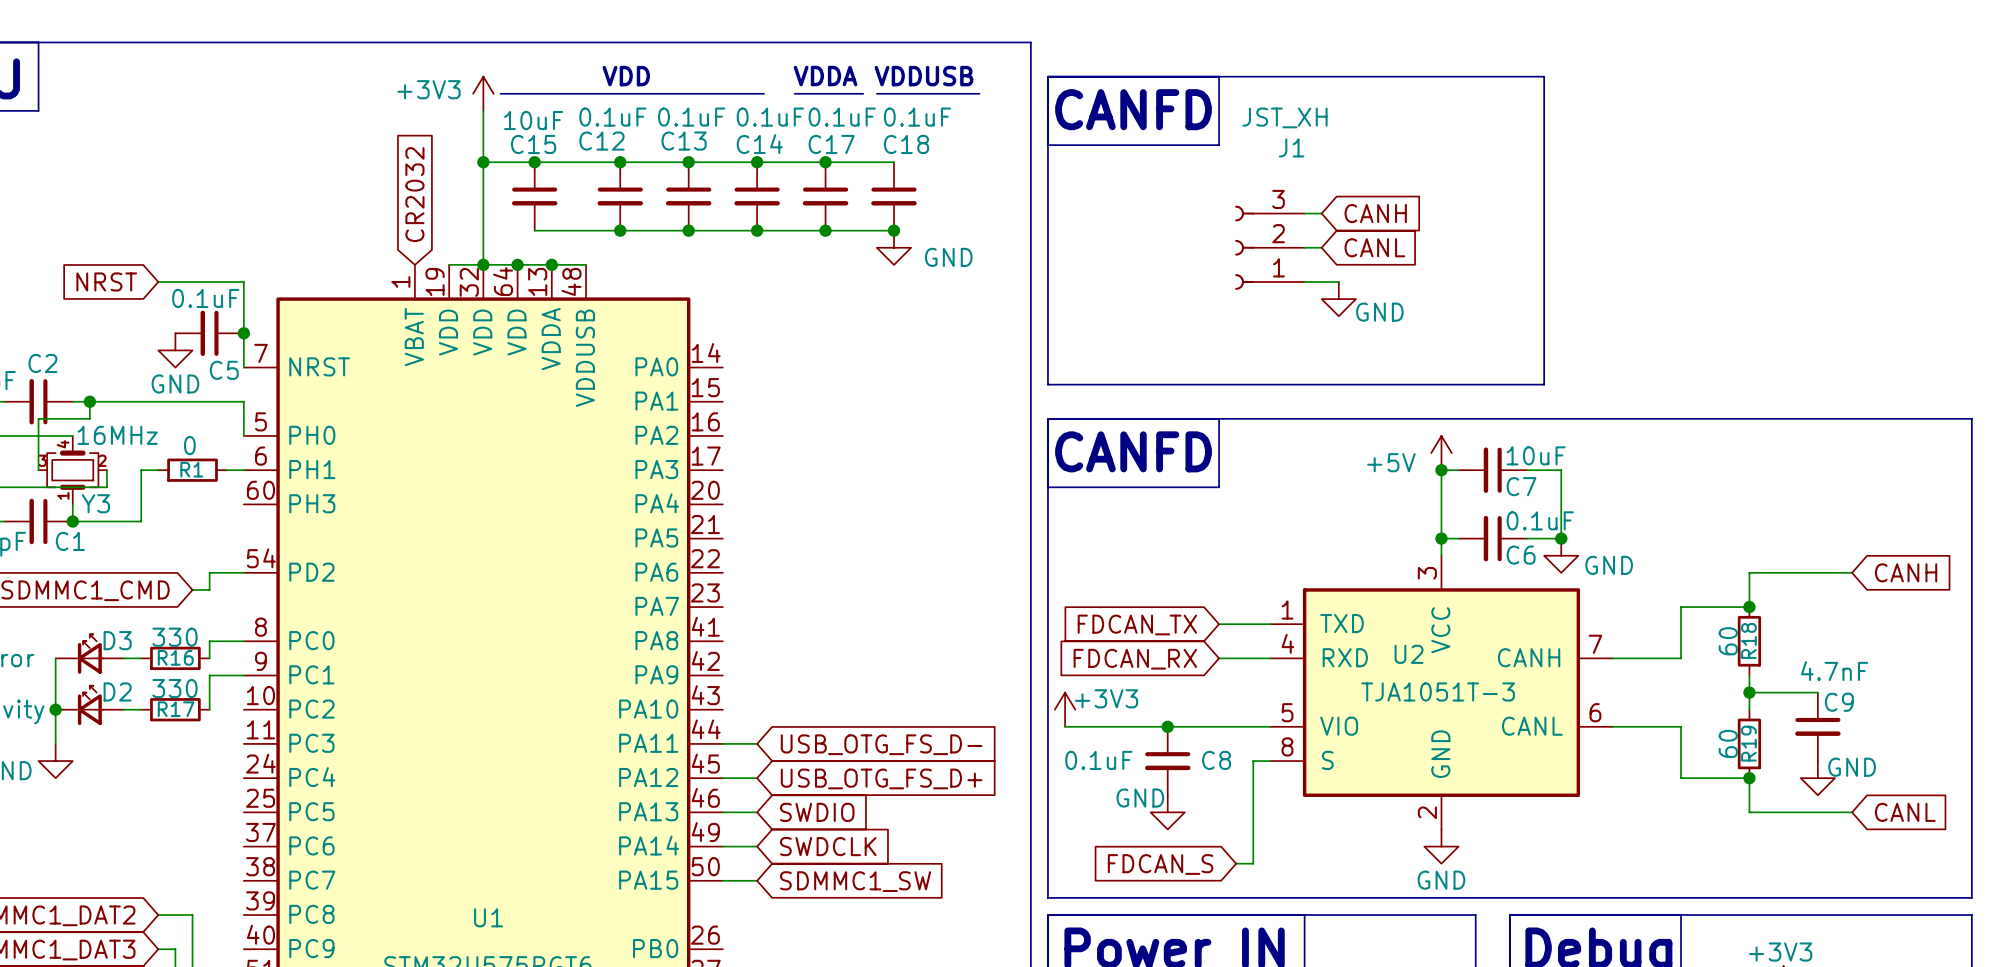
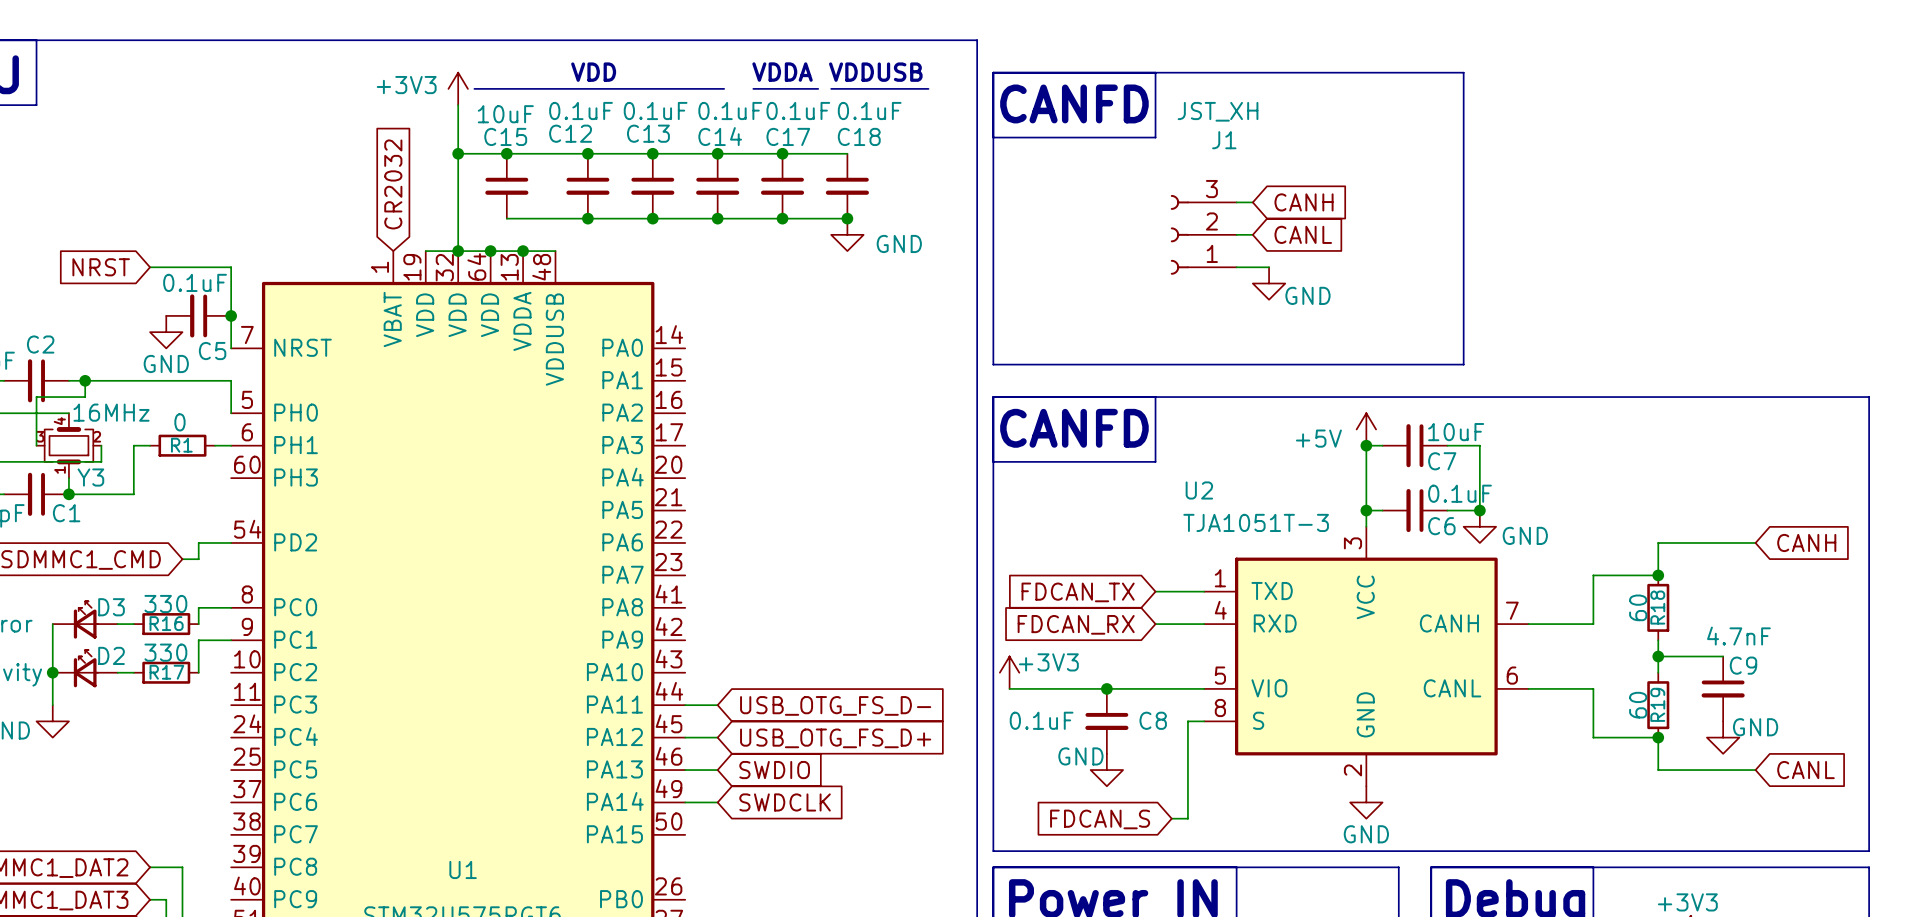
U2 name position: U2 (1409, 654) -> U2 (1199, 490)
U2 value position: TJA1051T-3 (1438, 691) -> TJA1051T-3 (1256, 522)
wire: (722, 880) (757, 880) -> none
global label: SDMMC1_SW (855, 881) -> none

